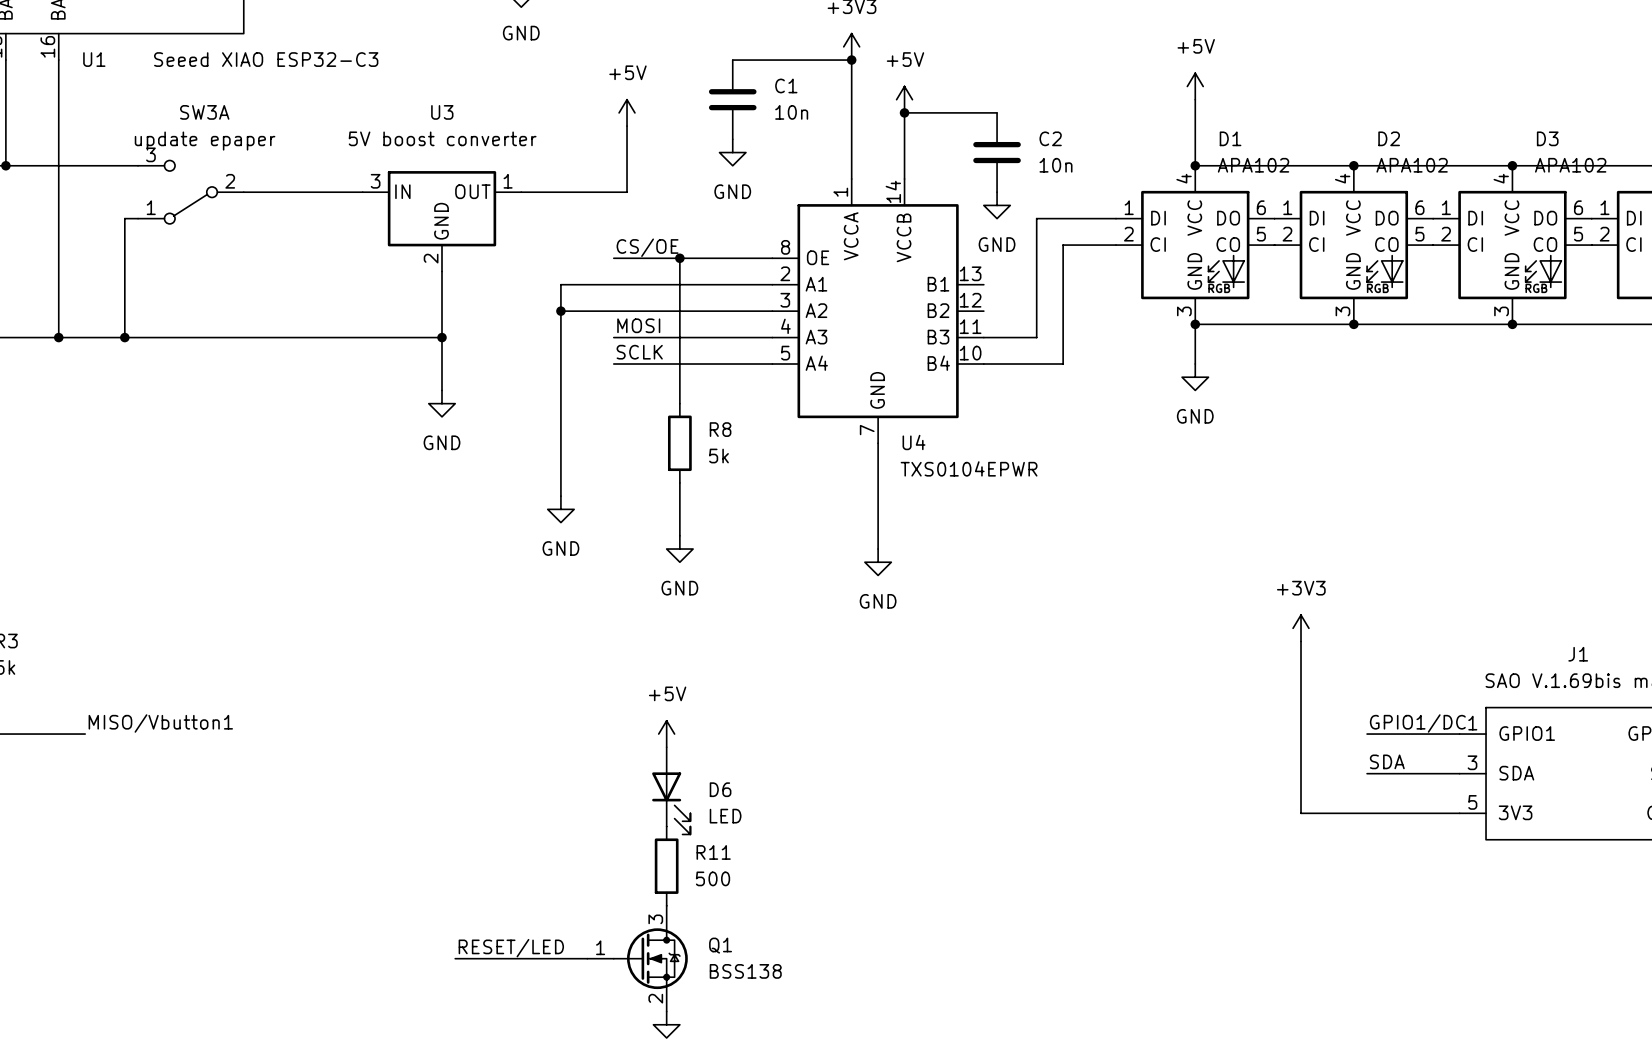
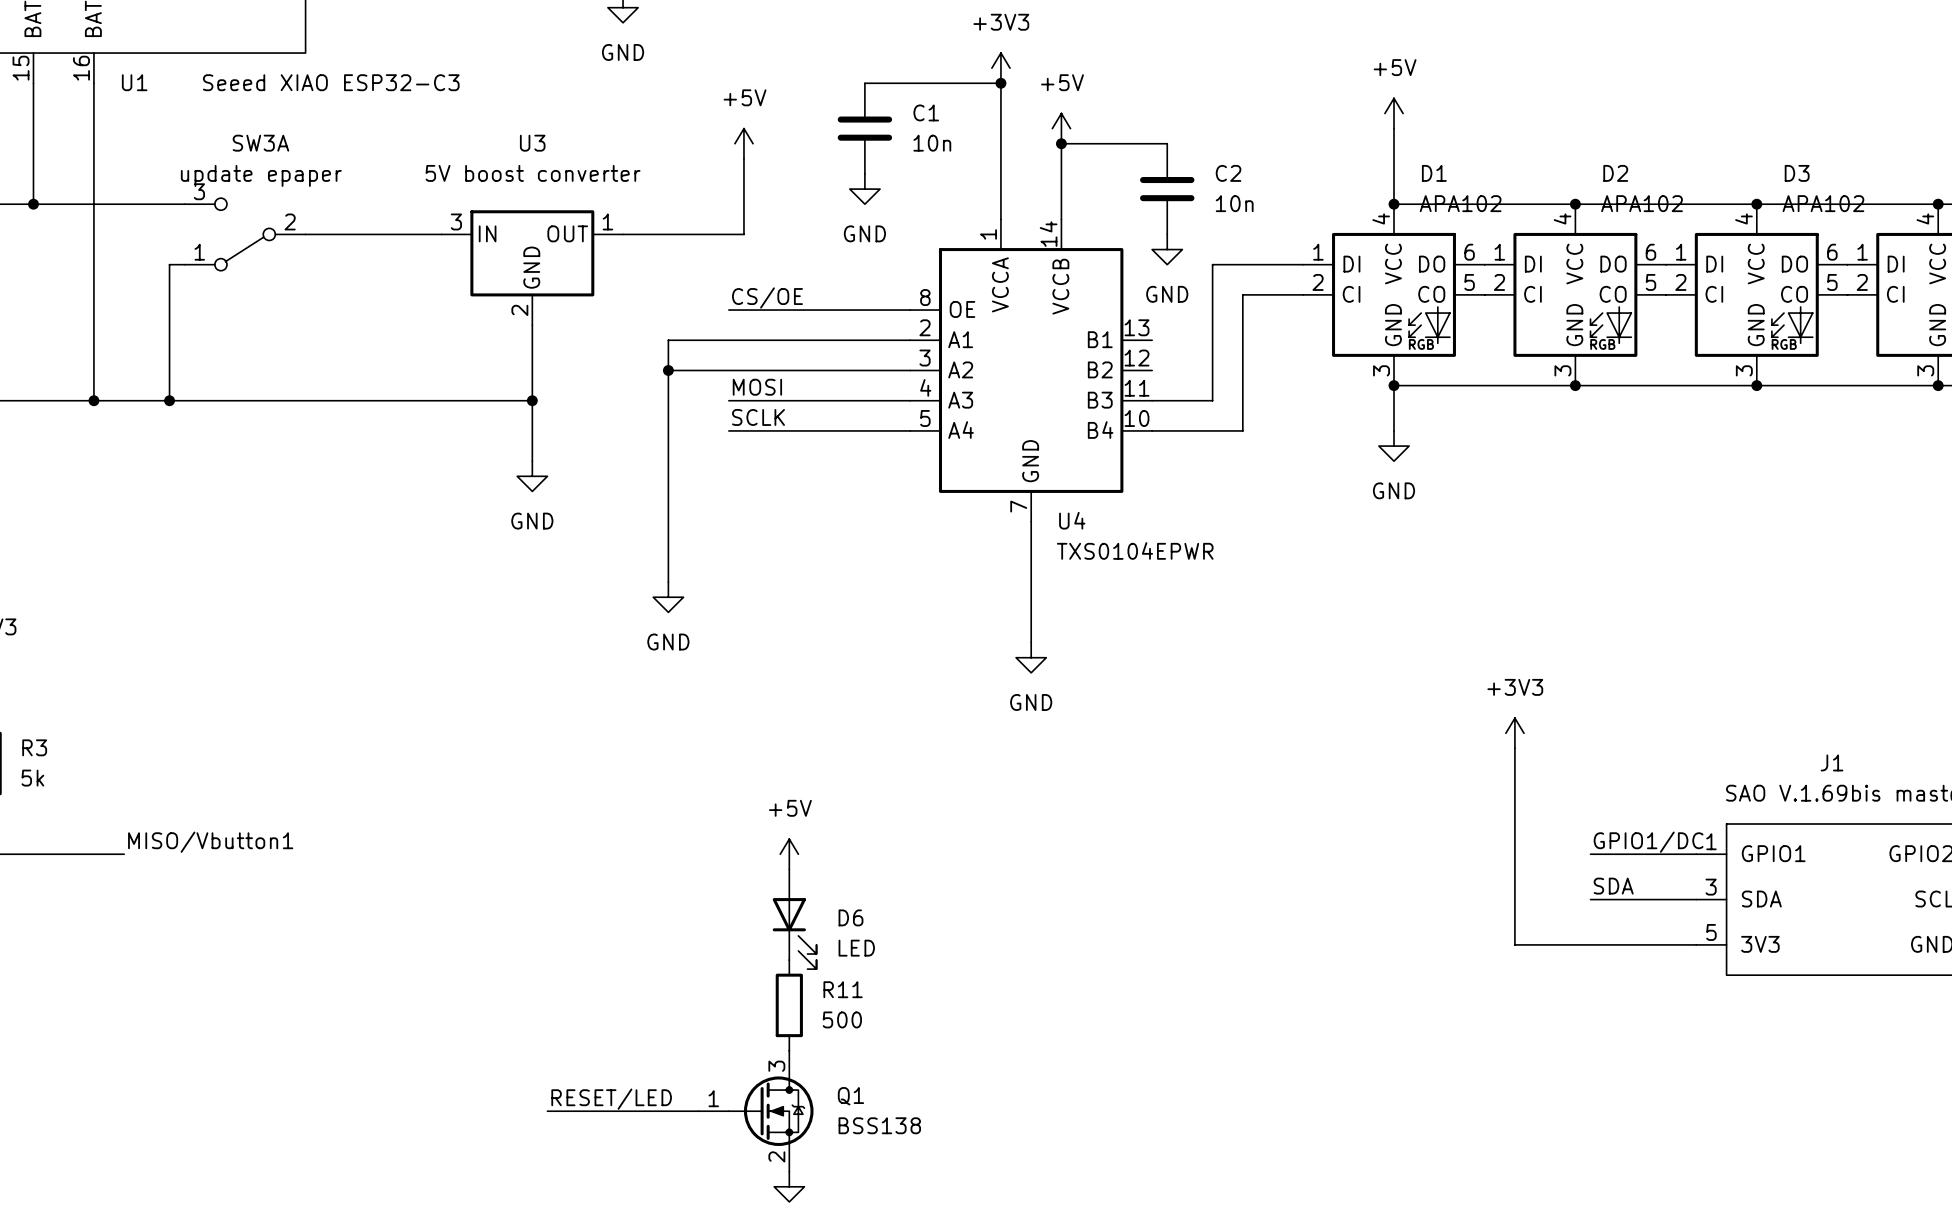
wire: (679, 258) (679, 403) -> none
junction: (679, 258) -> none
R8: 5k (679, 443) -> none
wire: (679, 482) (679, 535) -> none
power symbol: GND (679, 549) -> none

